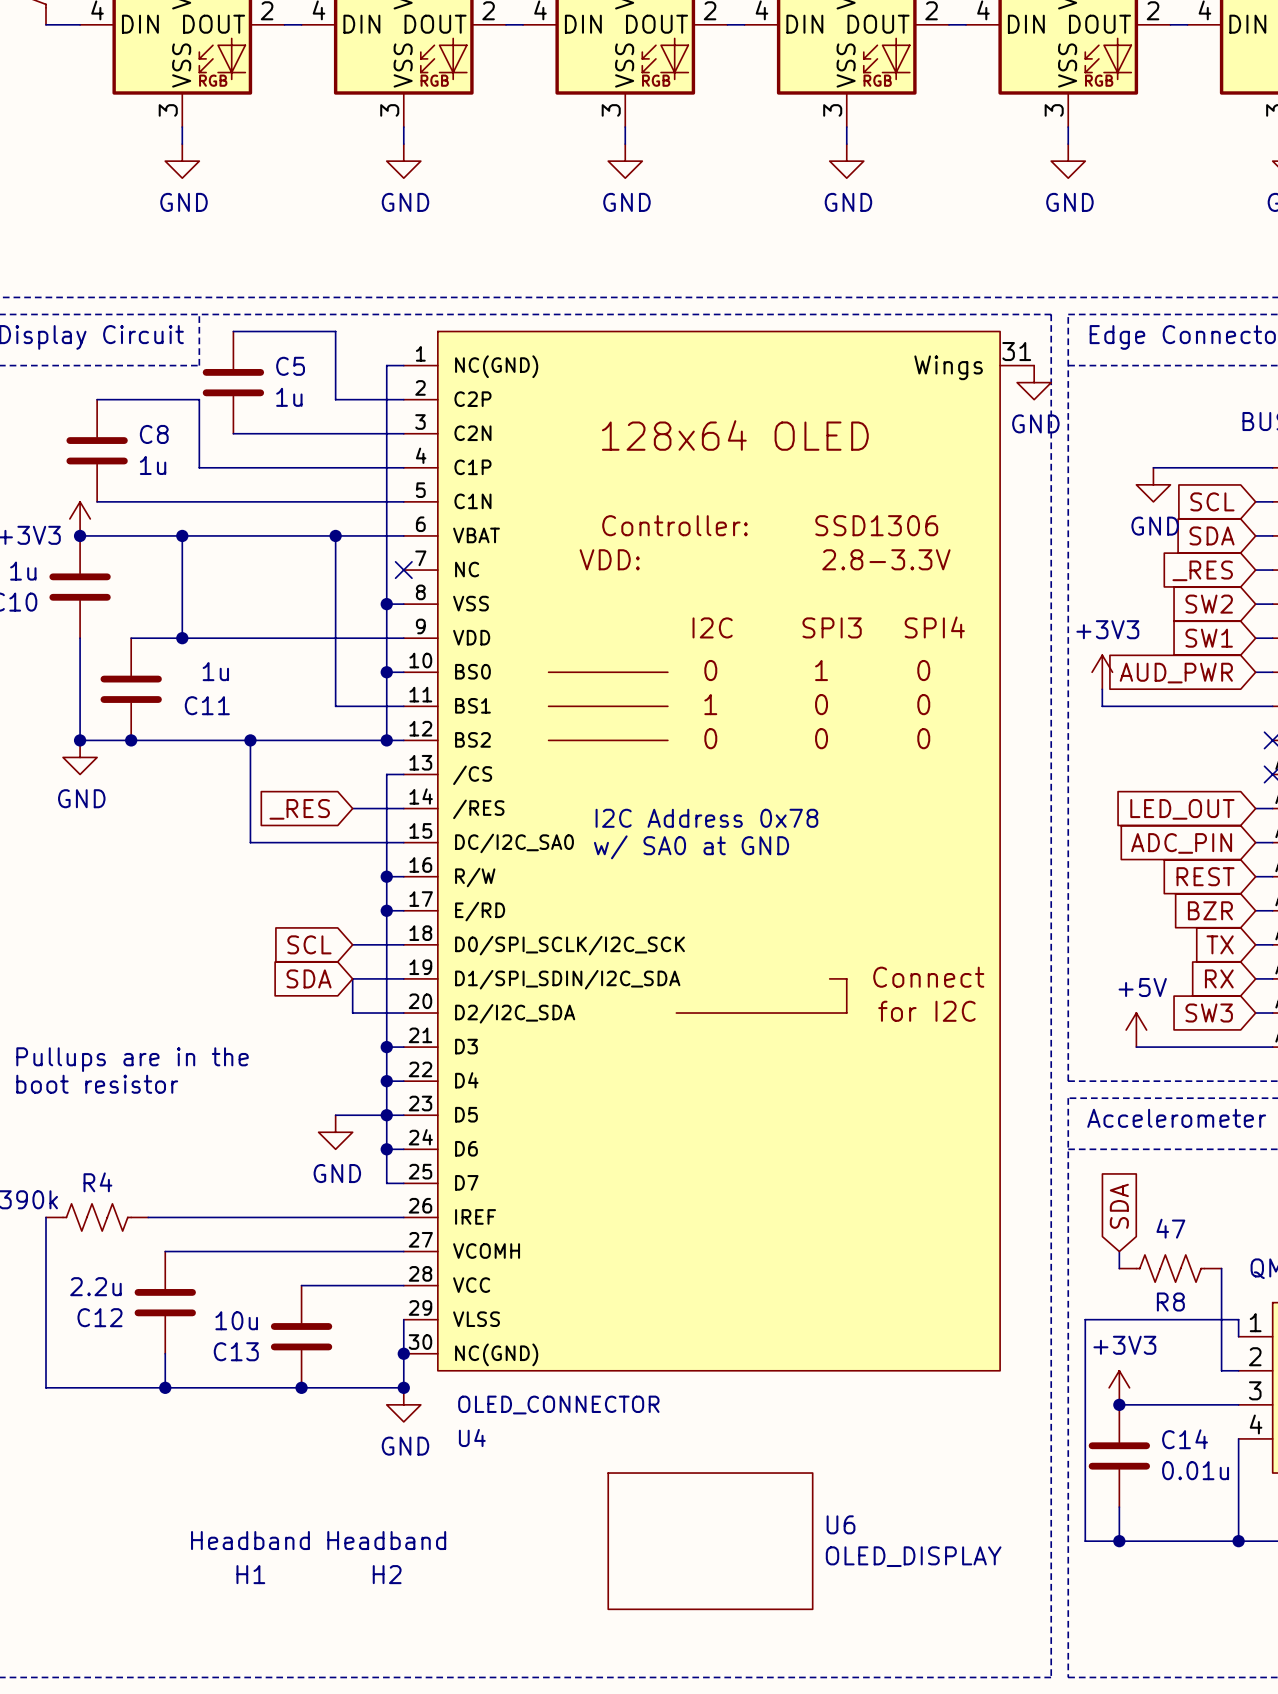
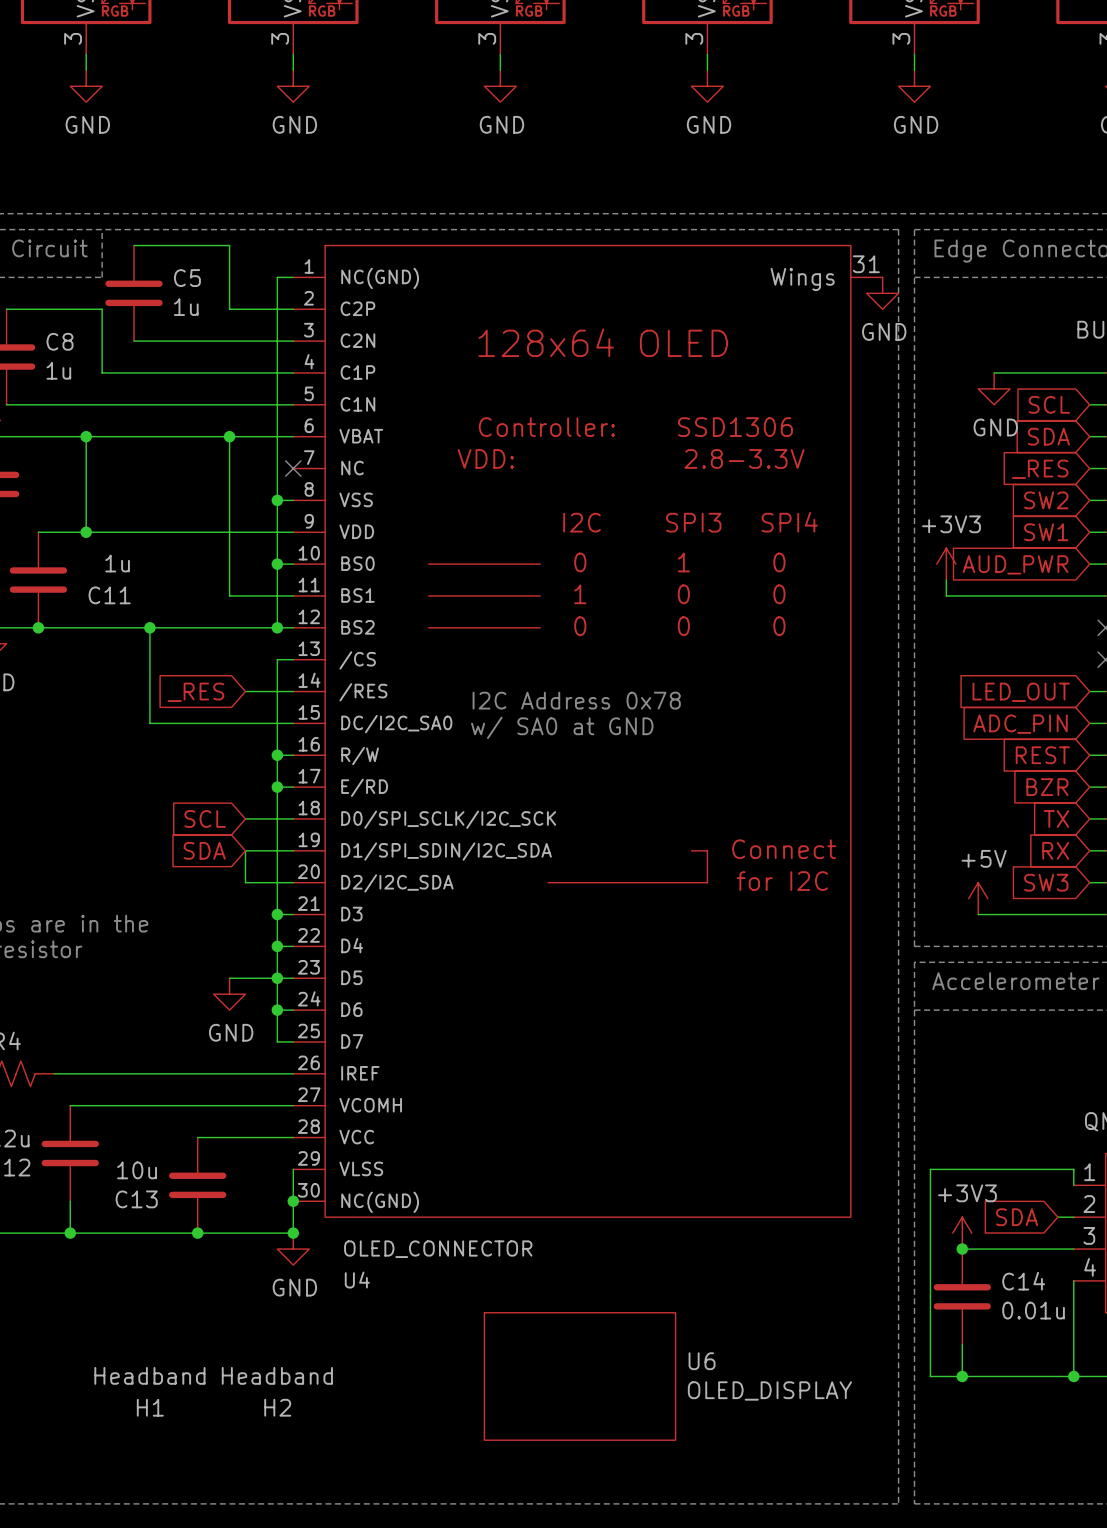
global label rotation: 0° (1119, 1206) -> 90° counterclockwise (1017, 1217)
global label position: SDA (1119, 1206) -> SDA (1017, 1217)
wire: (1119, 1251) (1119, 1268) -> none
R8: 47 (1170, 1268) -> none
wire: (1221, 1268) (1221, 1370) -> none

